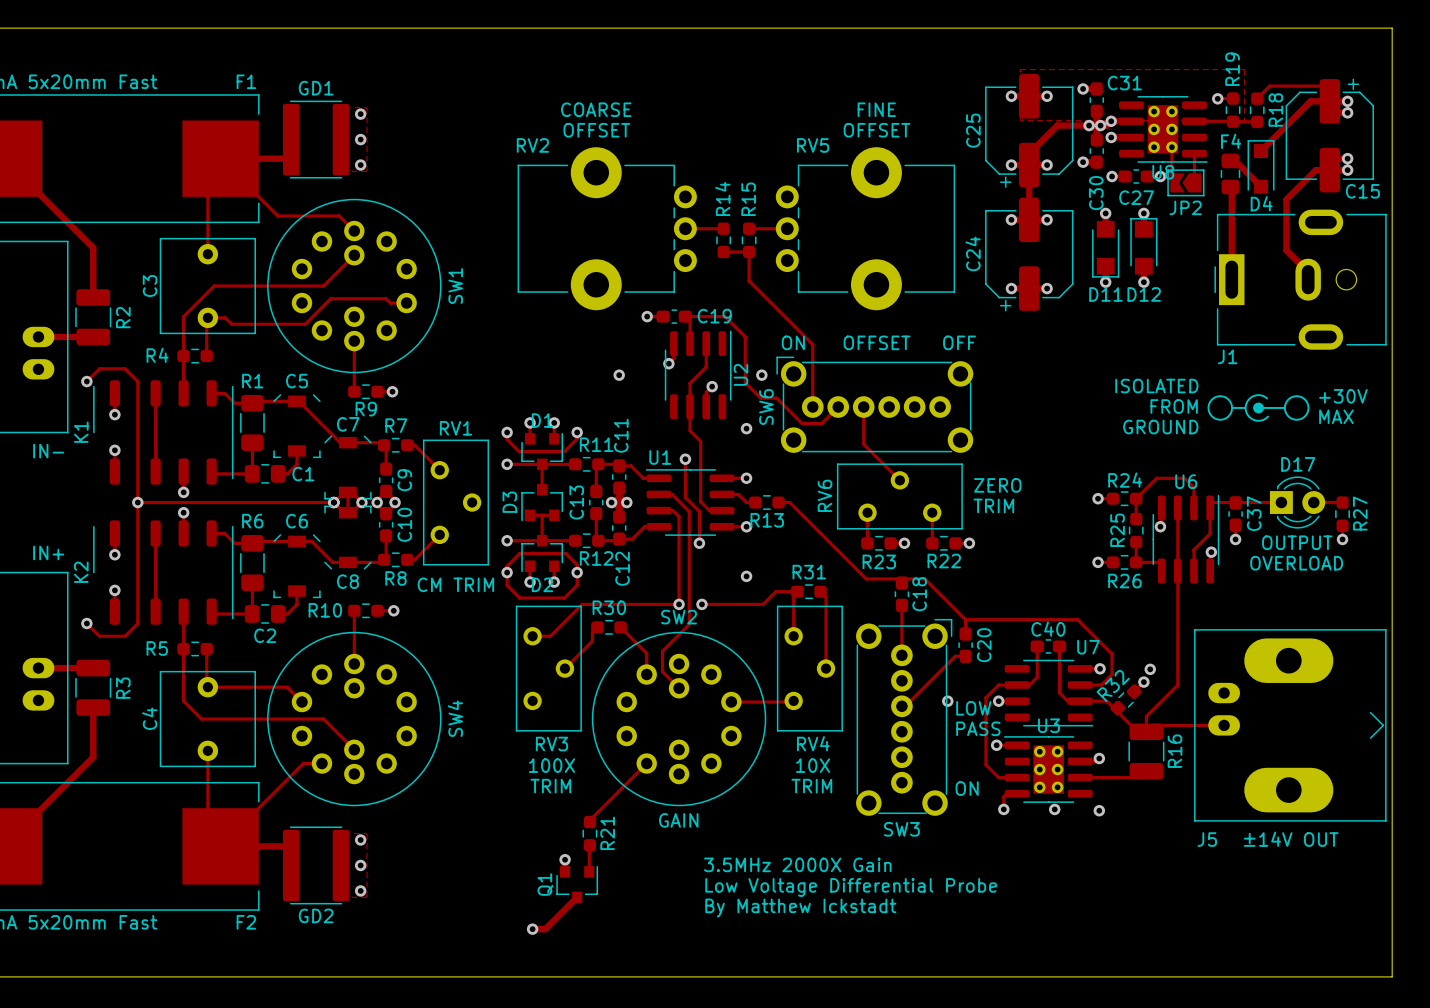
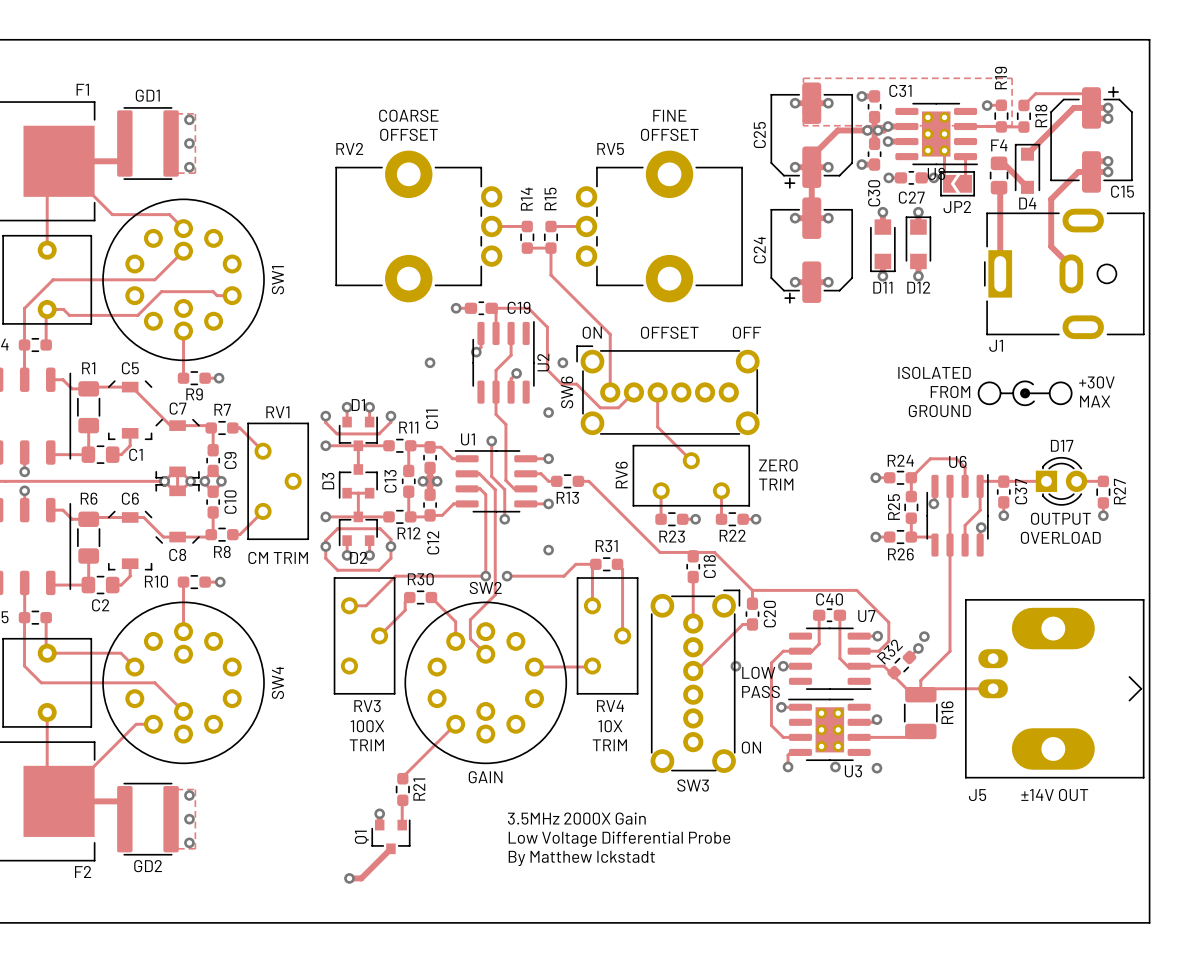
U3 name position: U3 (1048, 725) -> U3 (853, 771)

